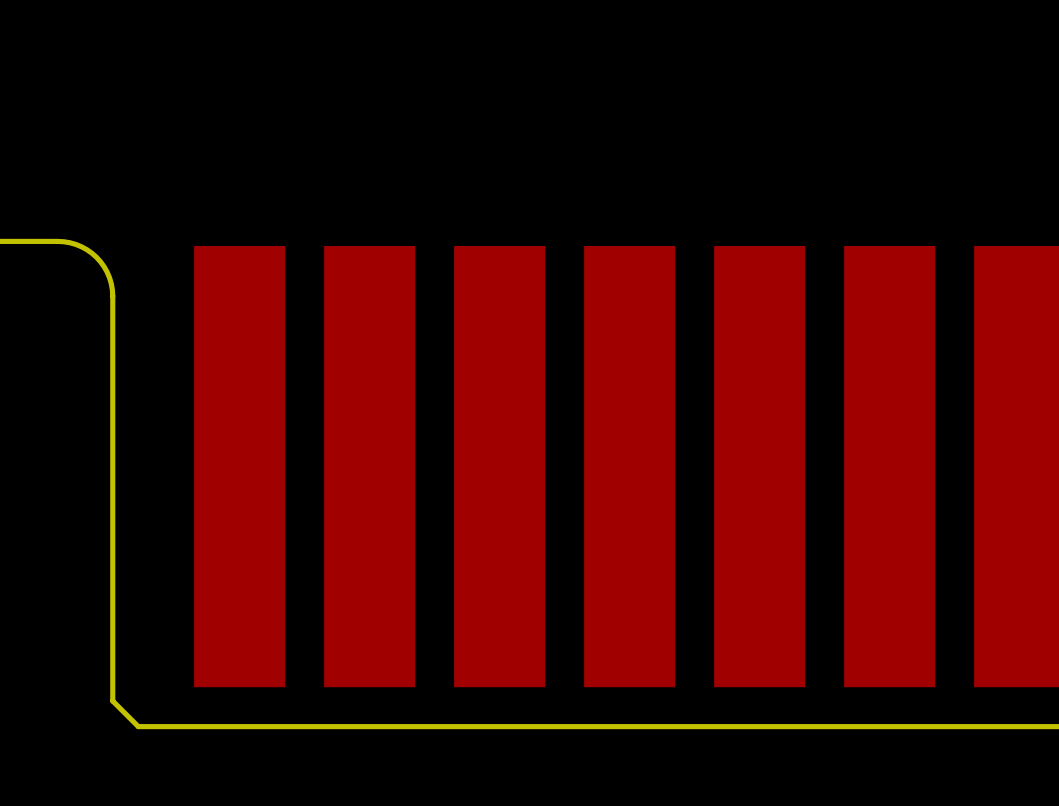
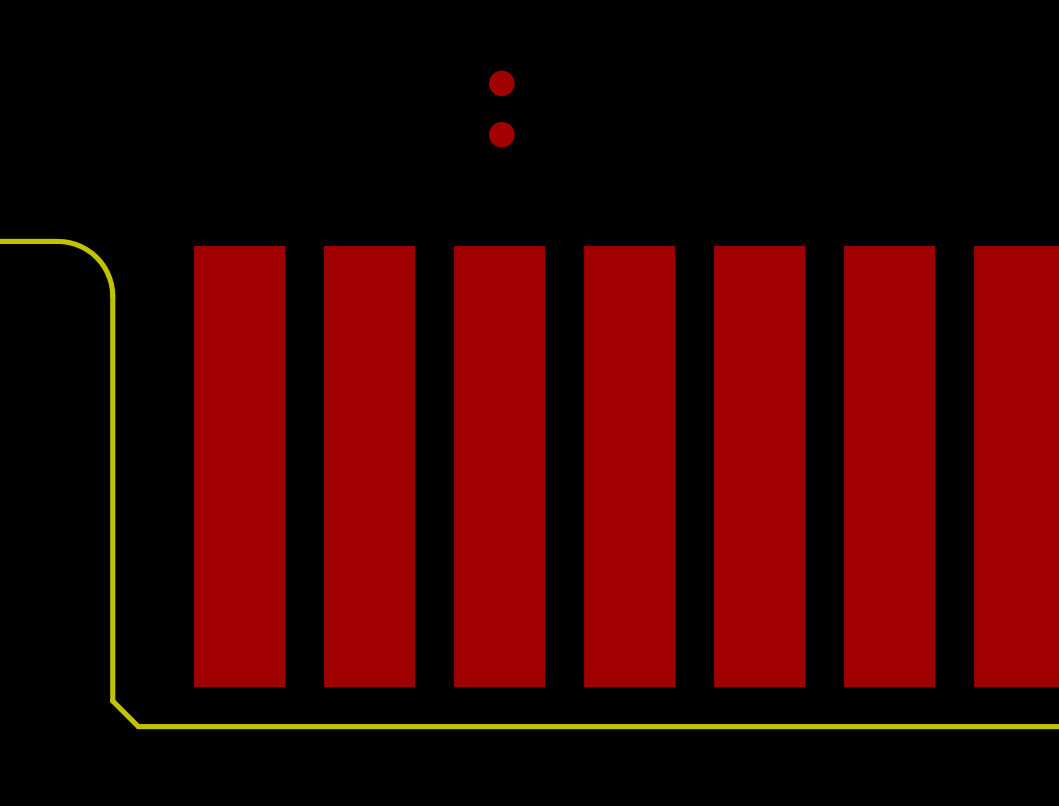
part: none -> (501, 109)

